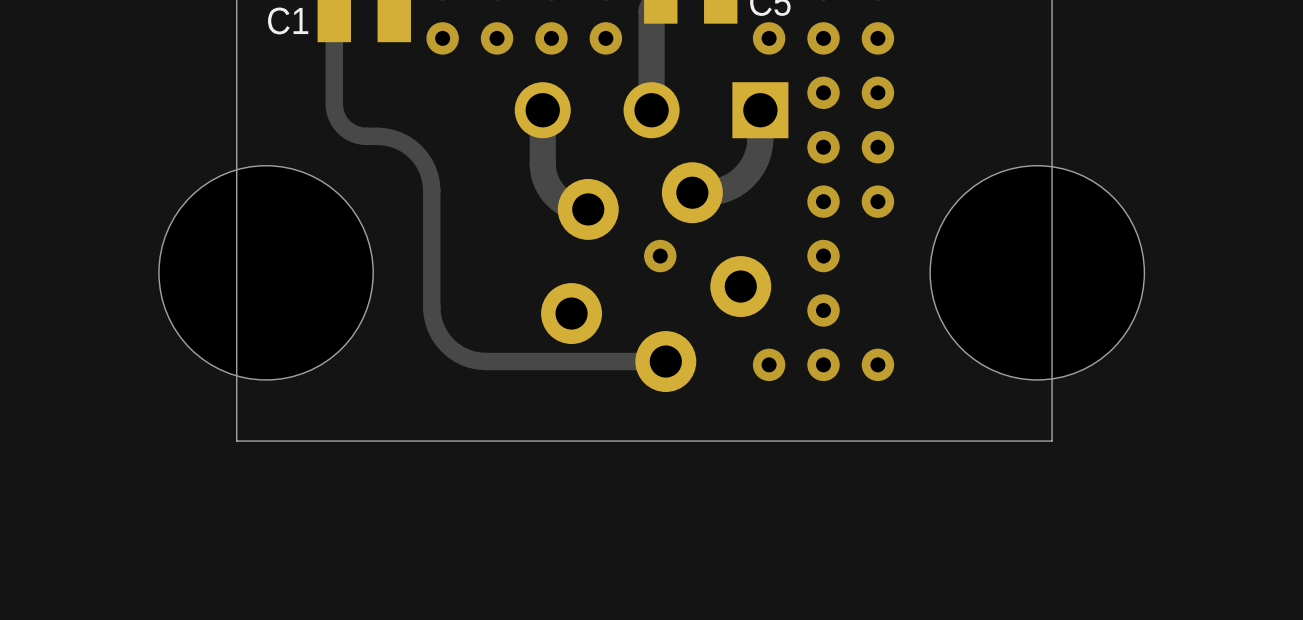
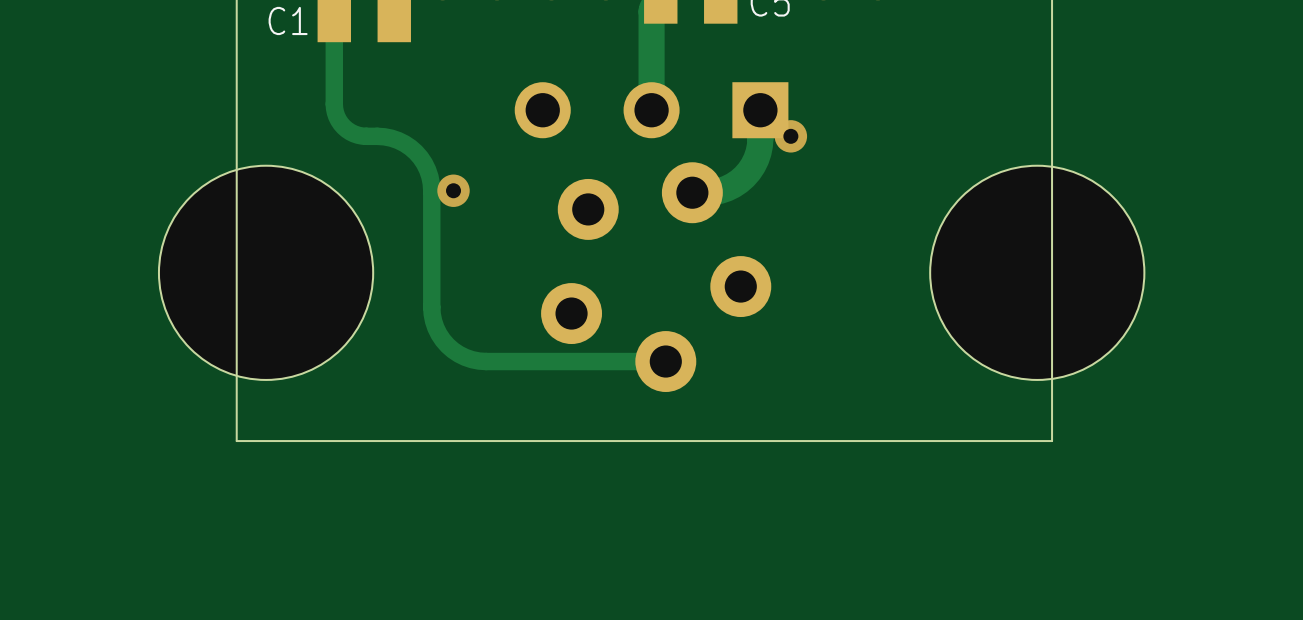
via: (442, 38) -> none
via: (497, 38) -> none
via: (551, 38) -> none
via: (605, 38) -> none
via: (769, 38) -> none
via: (823, 38) -> none
via: (877, 38) -> none
via: (823, 92) -> none
via: (877, 92) -> none
track: (542, 110) (542, 163) (546, 181) (552, 191) (565, 203) (576, 207) (588, 209) -> none
via: none -> (790, 136)
via: (823, 147) -> none
via: (877, 147) -> none
via: none -> (453, 190)
via: (823, 201) -> none
via: (877, 201) -> none
via: (660, 256) -> none
via: (823, 256) -> none
via: (823, 310) -> none
via: (769, 364) -> none
via: (823, 364) -> none
via: (877, 364) -> none

